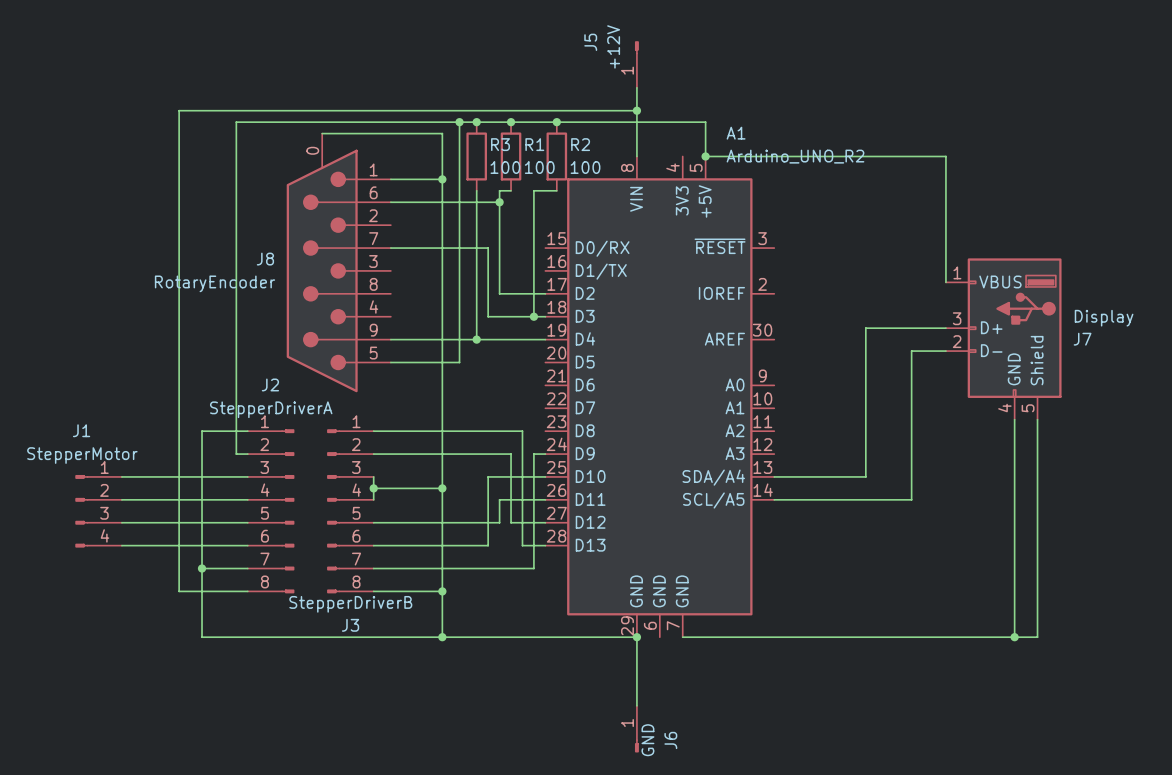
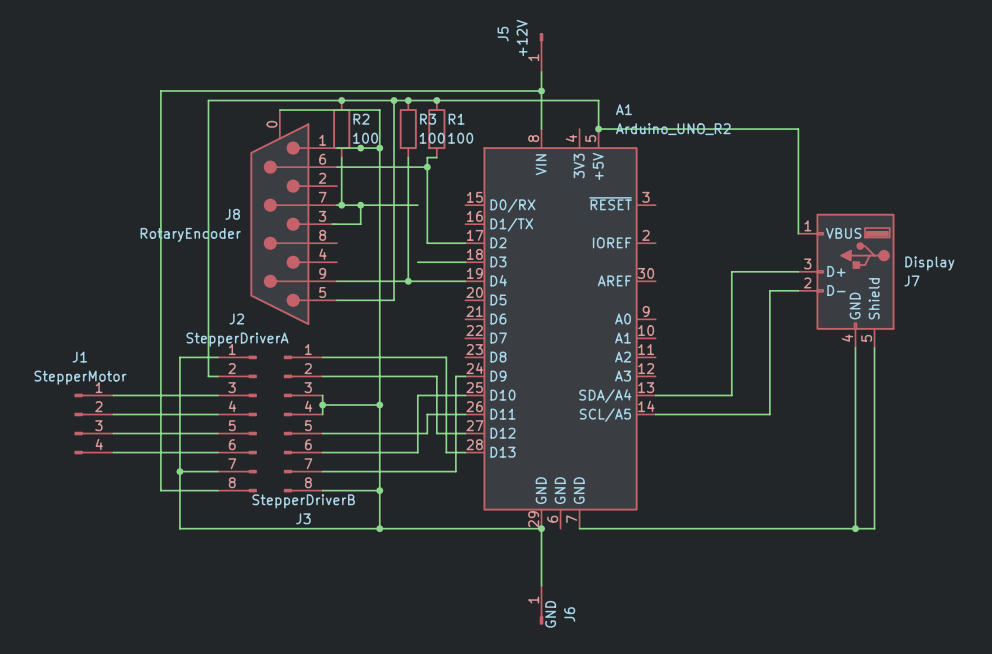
junction: none -> (341, 100)
junction: (556, 122) -> none
R2 position: (556, 156) -> (341, 129)
junction: none -> (360, 148)
wire: none -> (341, 157) (341, 205)
wire: (556, 190) (533, 190) (533, 316) -> none
junction: none -> (341, 205)
wire: none -> (360, 205) (360, 224) (332, 224)
junction: none -> (360, 205)
wire: (488, 248) (488, 316) -> none
junction: (533, 316) -> none

